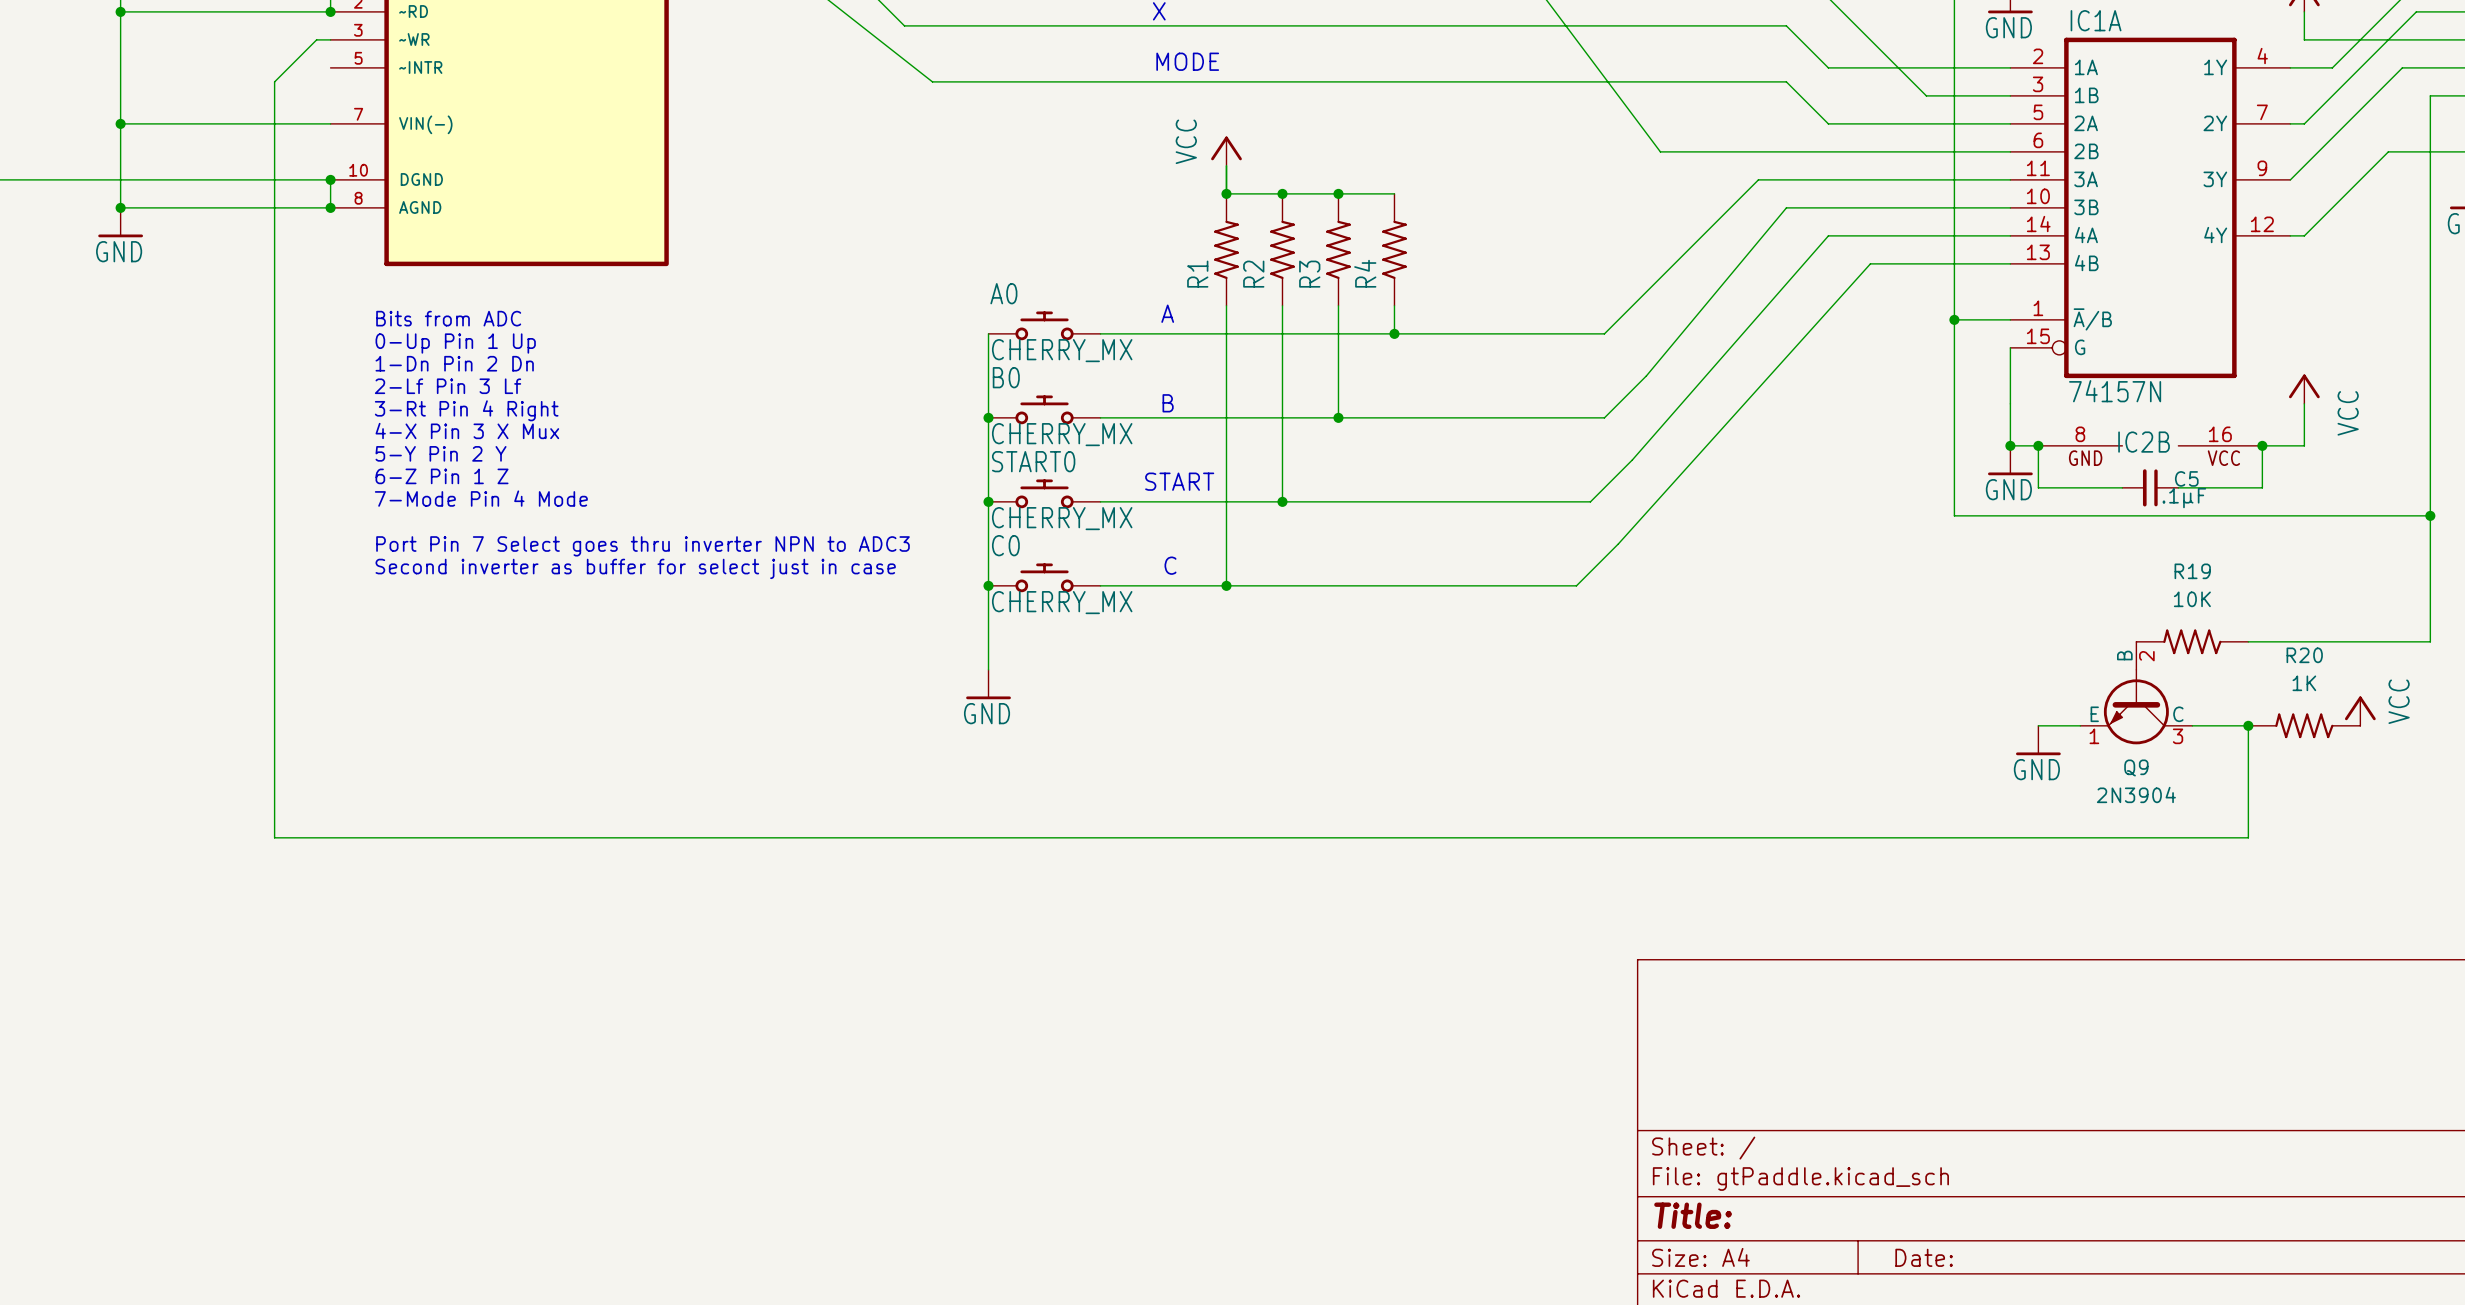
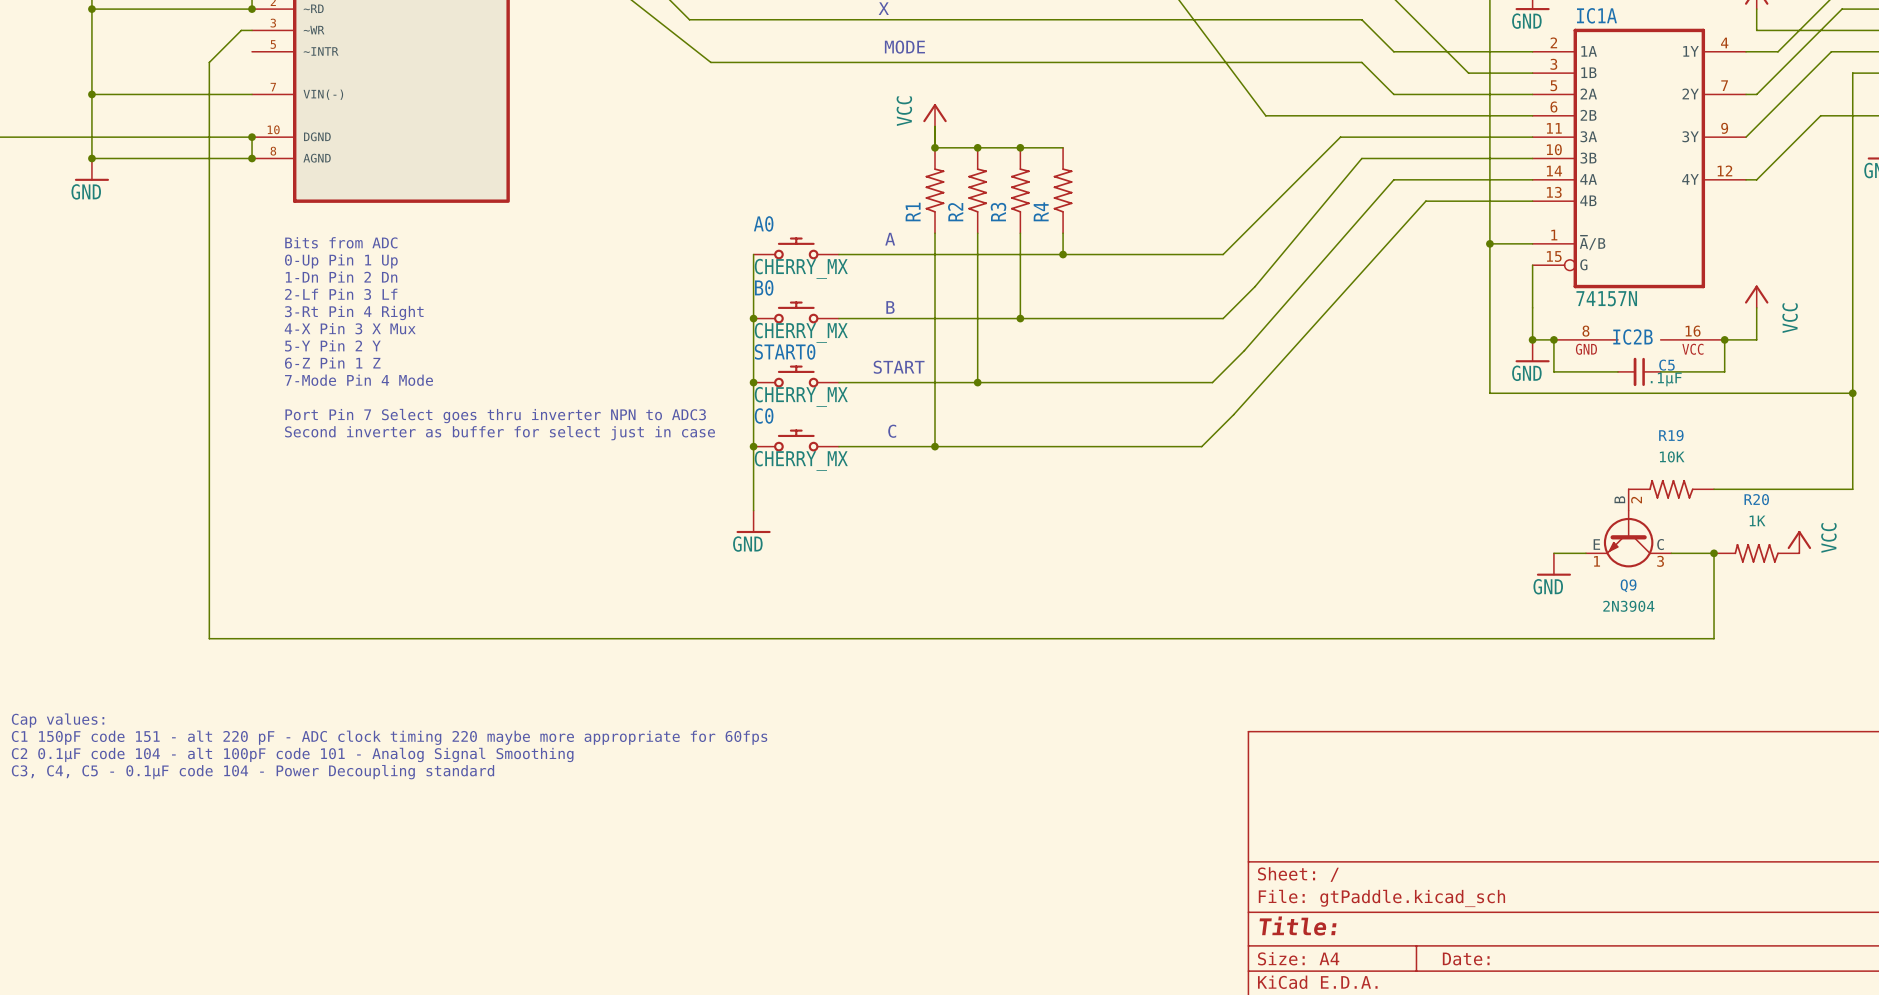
text: none -> Cap values: (58, 720)
text: none -> C1 150pF code 151 - alt 220 pF - ADC clock timing 220 maybe more appropriate for 60fps (389, 737)
text: none -> C2 0.1µF code 104 - alt 100pF code 101 - Analog Signal Smoothing (292, 754)
text: none -> C3, C4, C5 - 0.1µF code 104 - Power Decoupling standard (253, 772)

